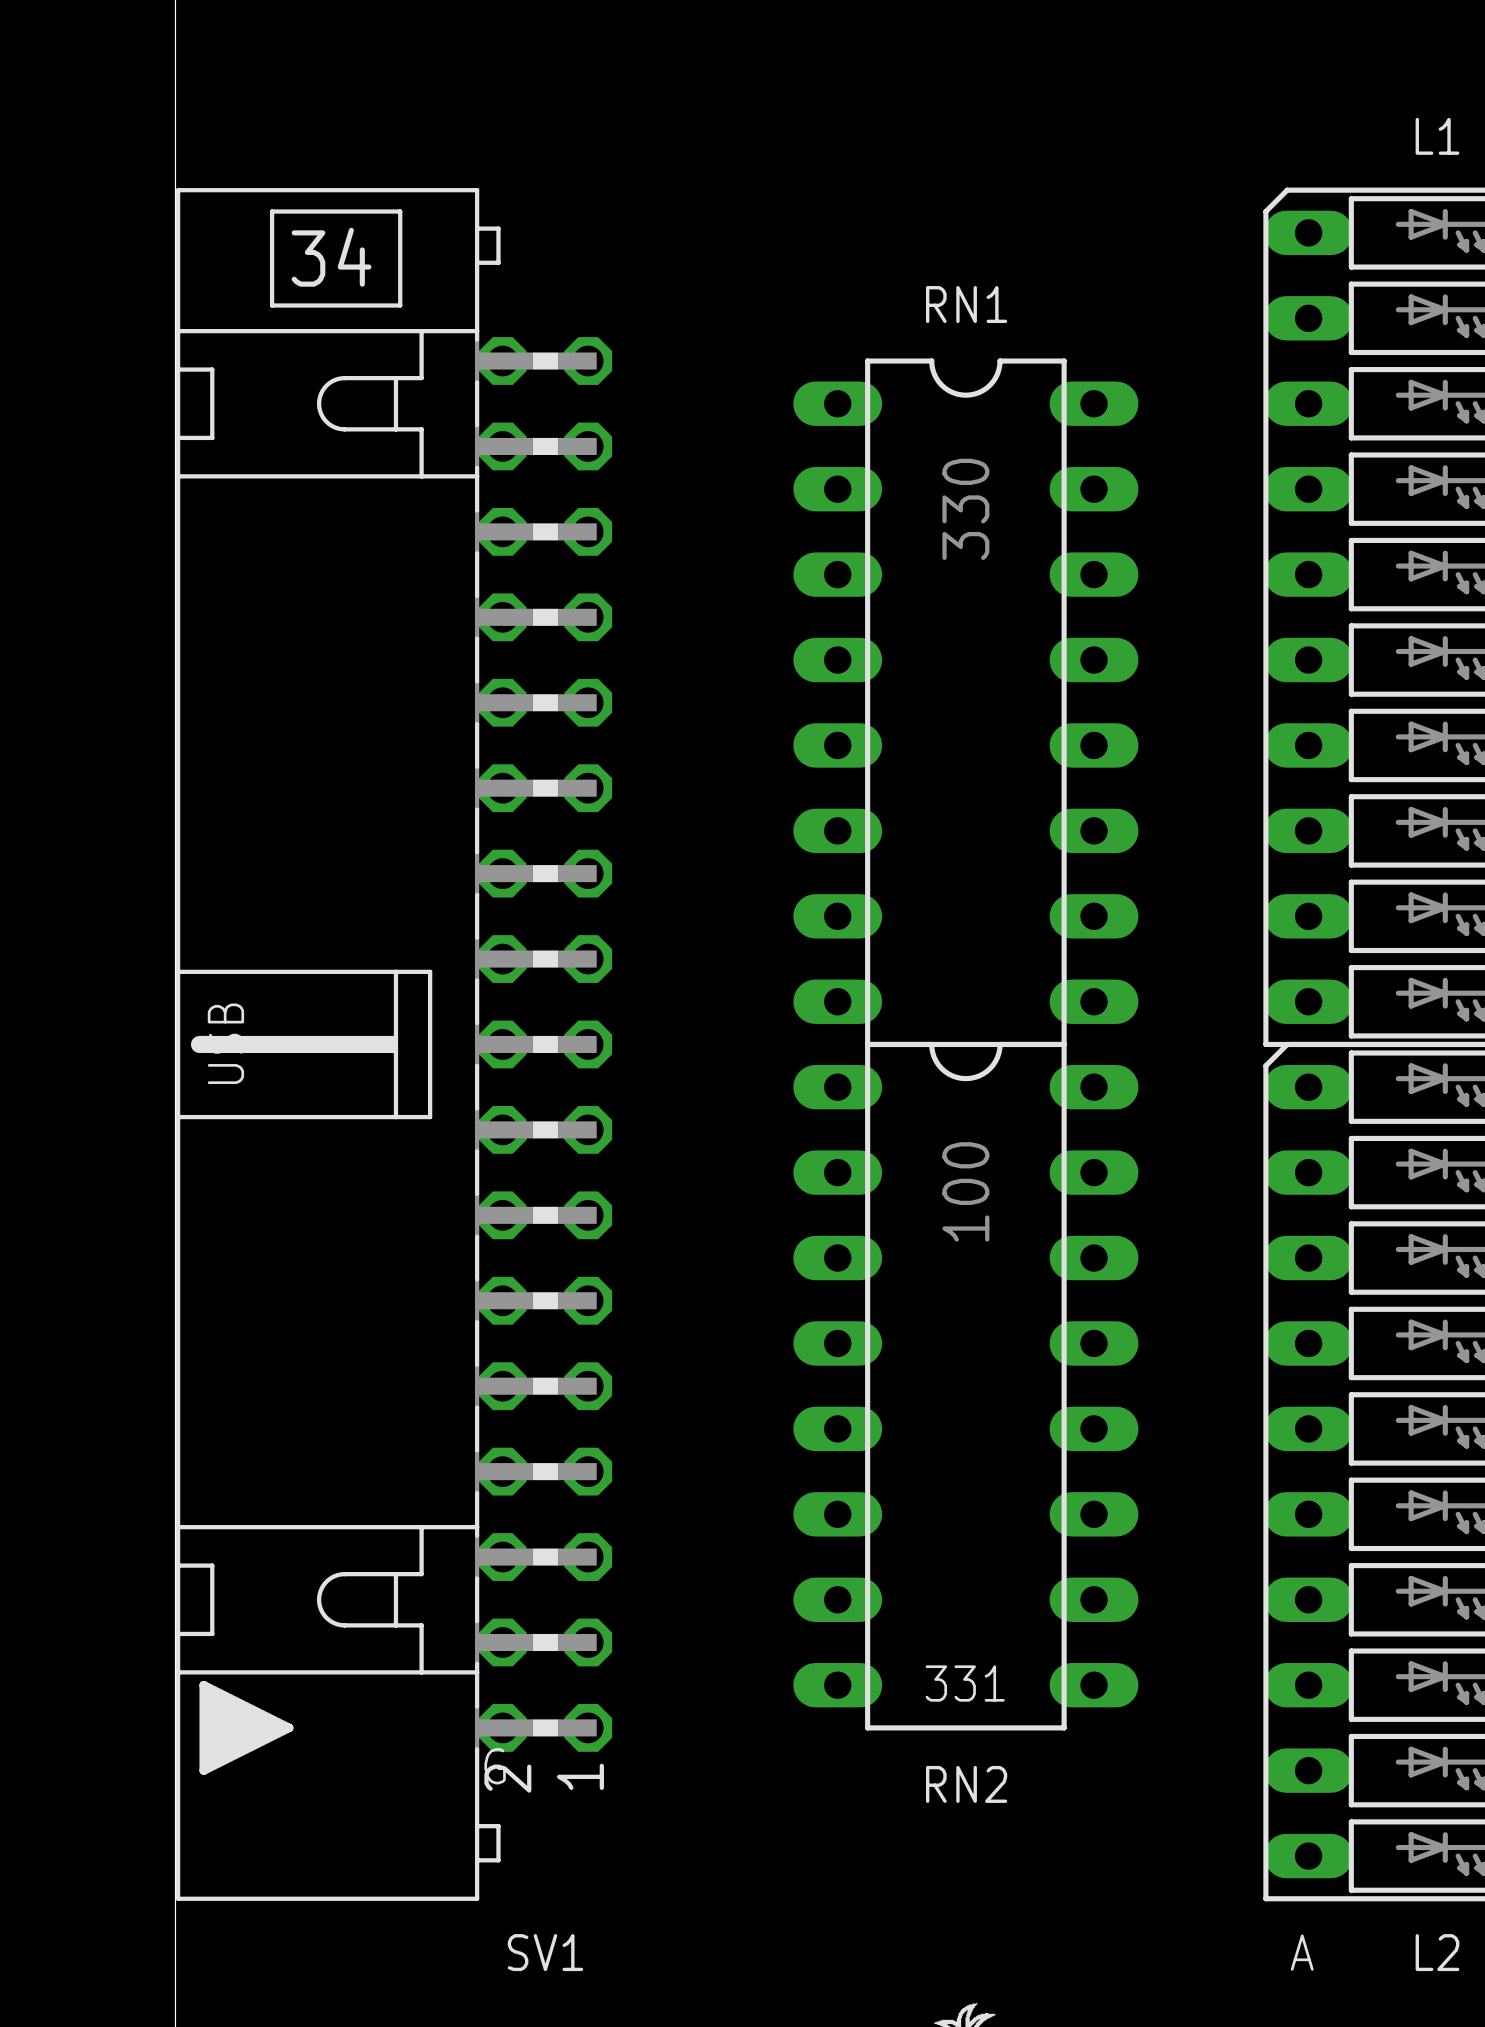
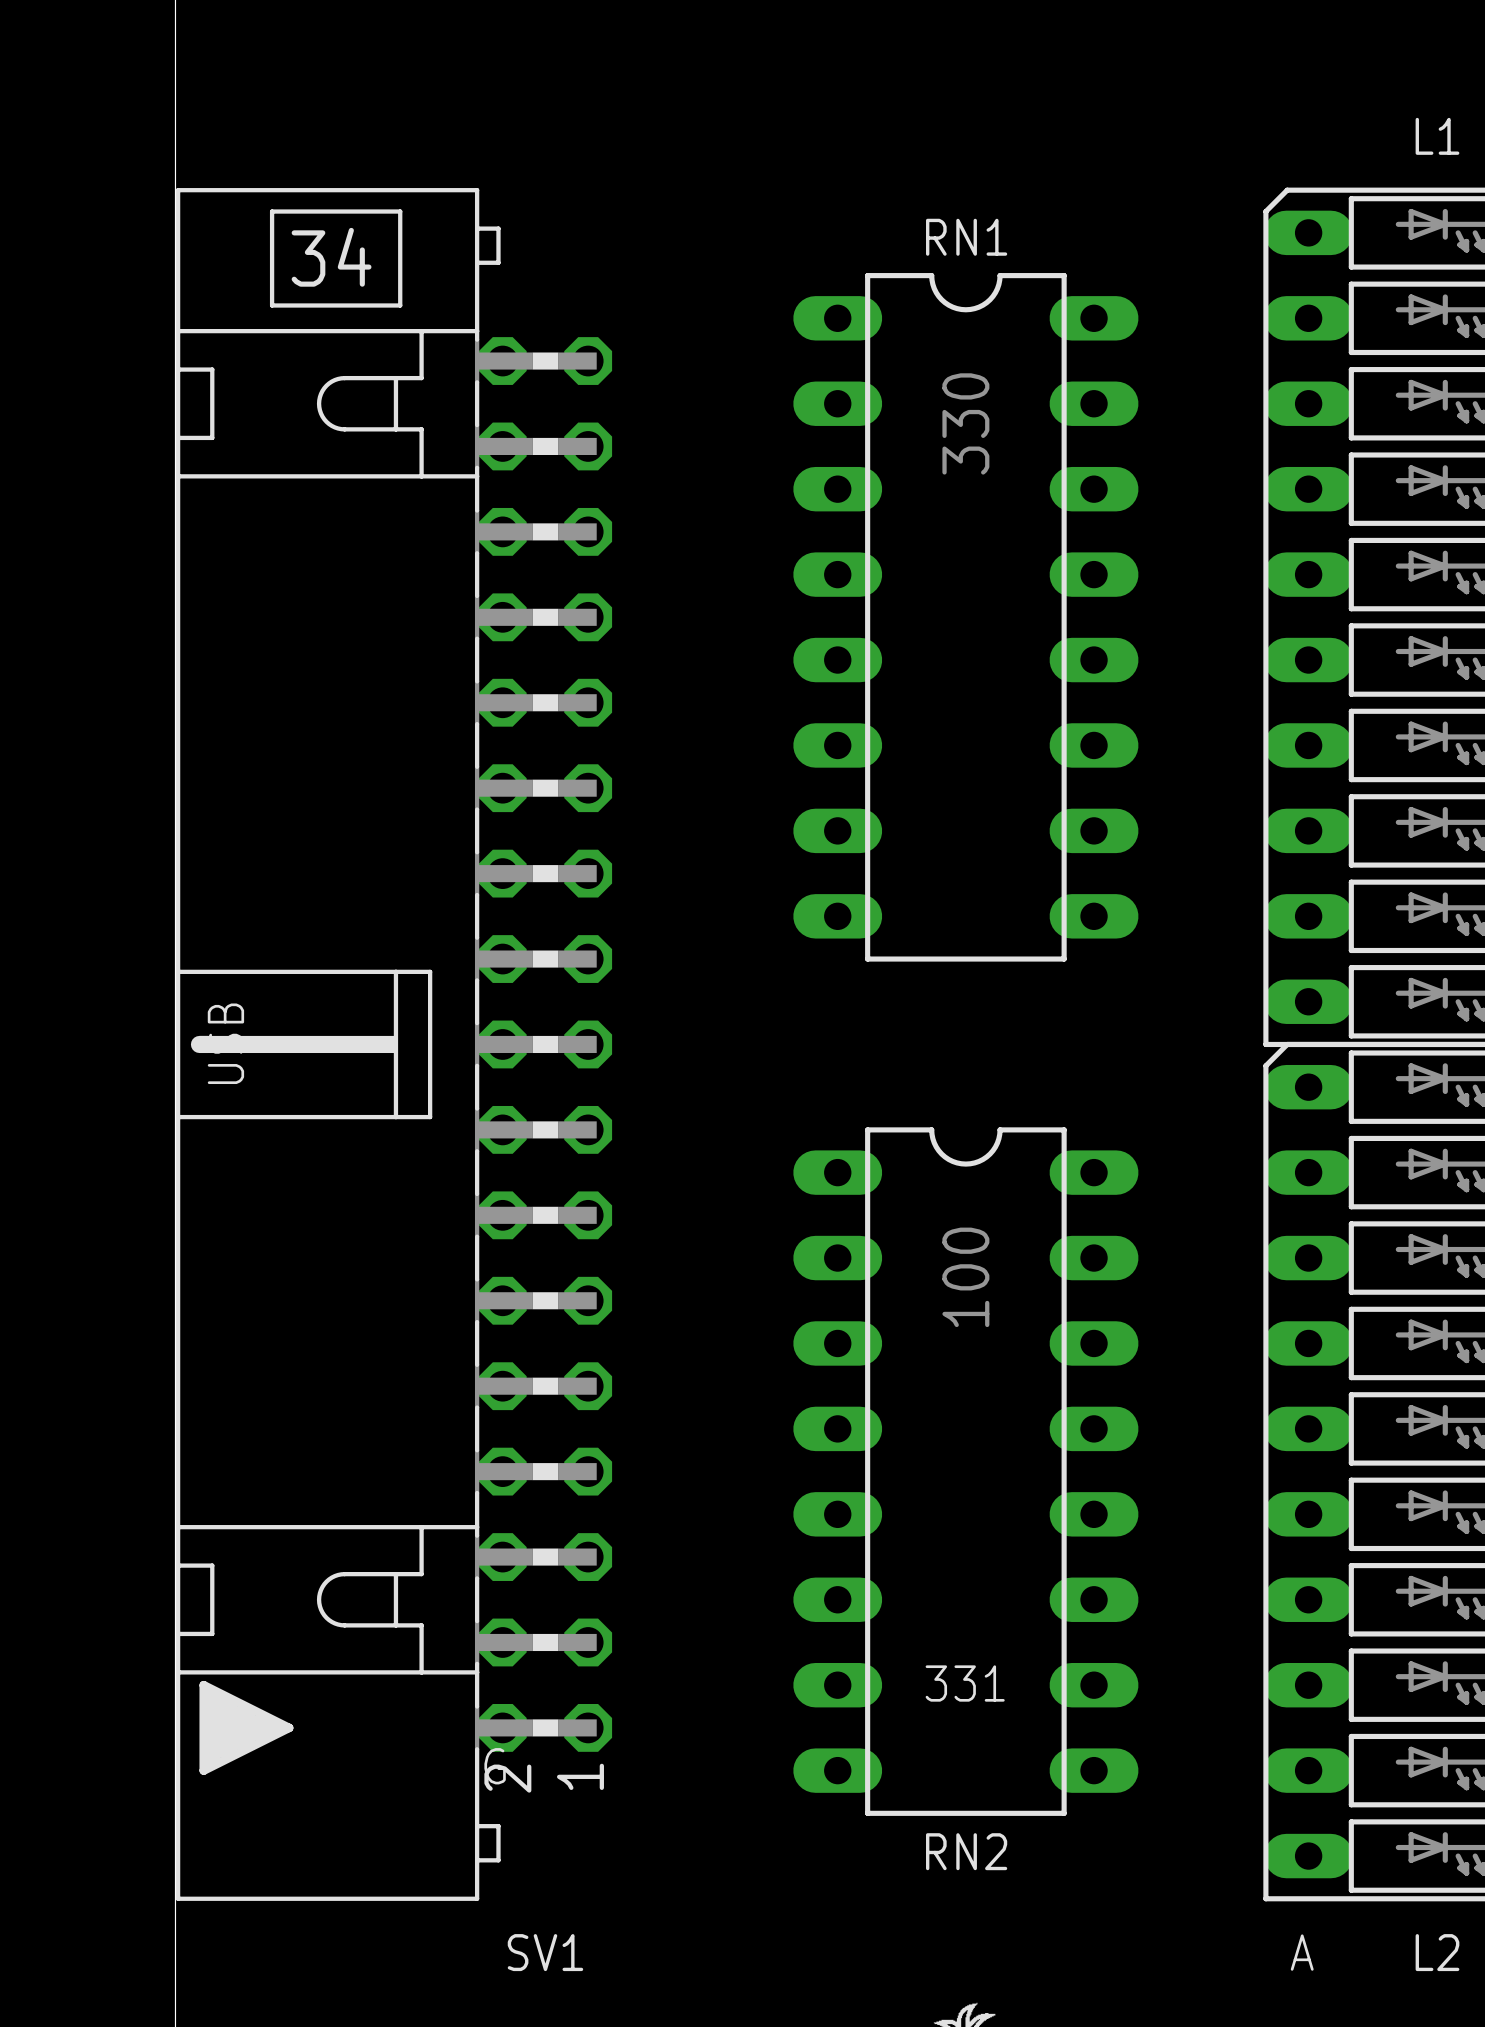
RN1 name position: RN1 (966, 304) -> RN1 (966, 237)
RN1 position: (965, 702) -> (965, 617)
RN2 position: (965, 1386) -> (965, 1471)
RN2 name position: RN2 (966, 1784) -> RN2 (966, 1851)

